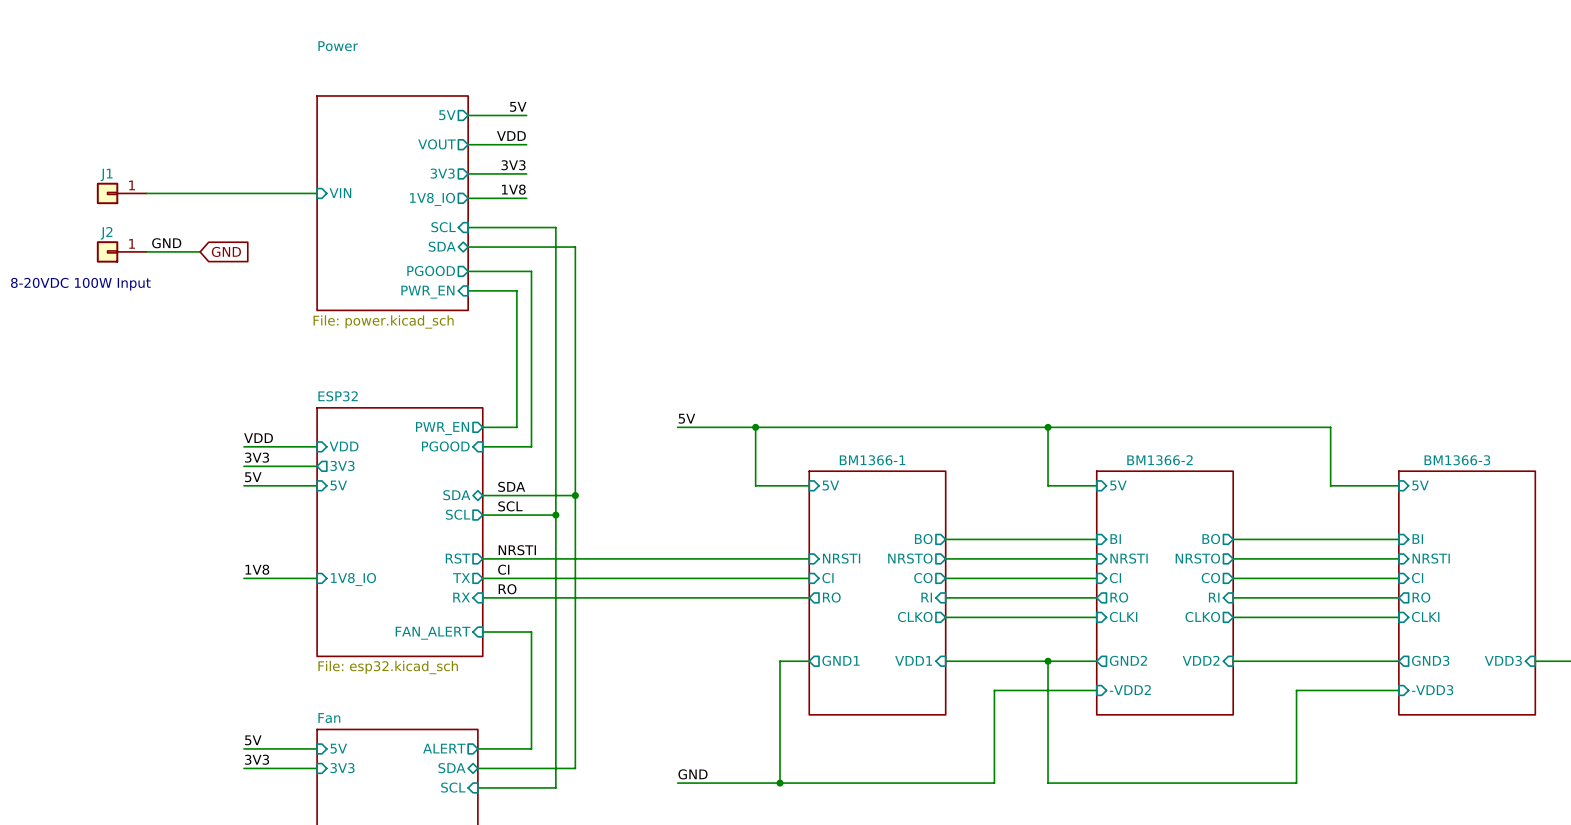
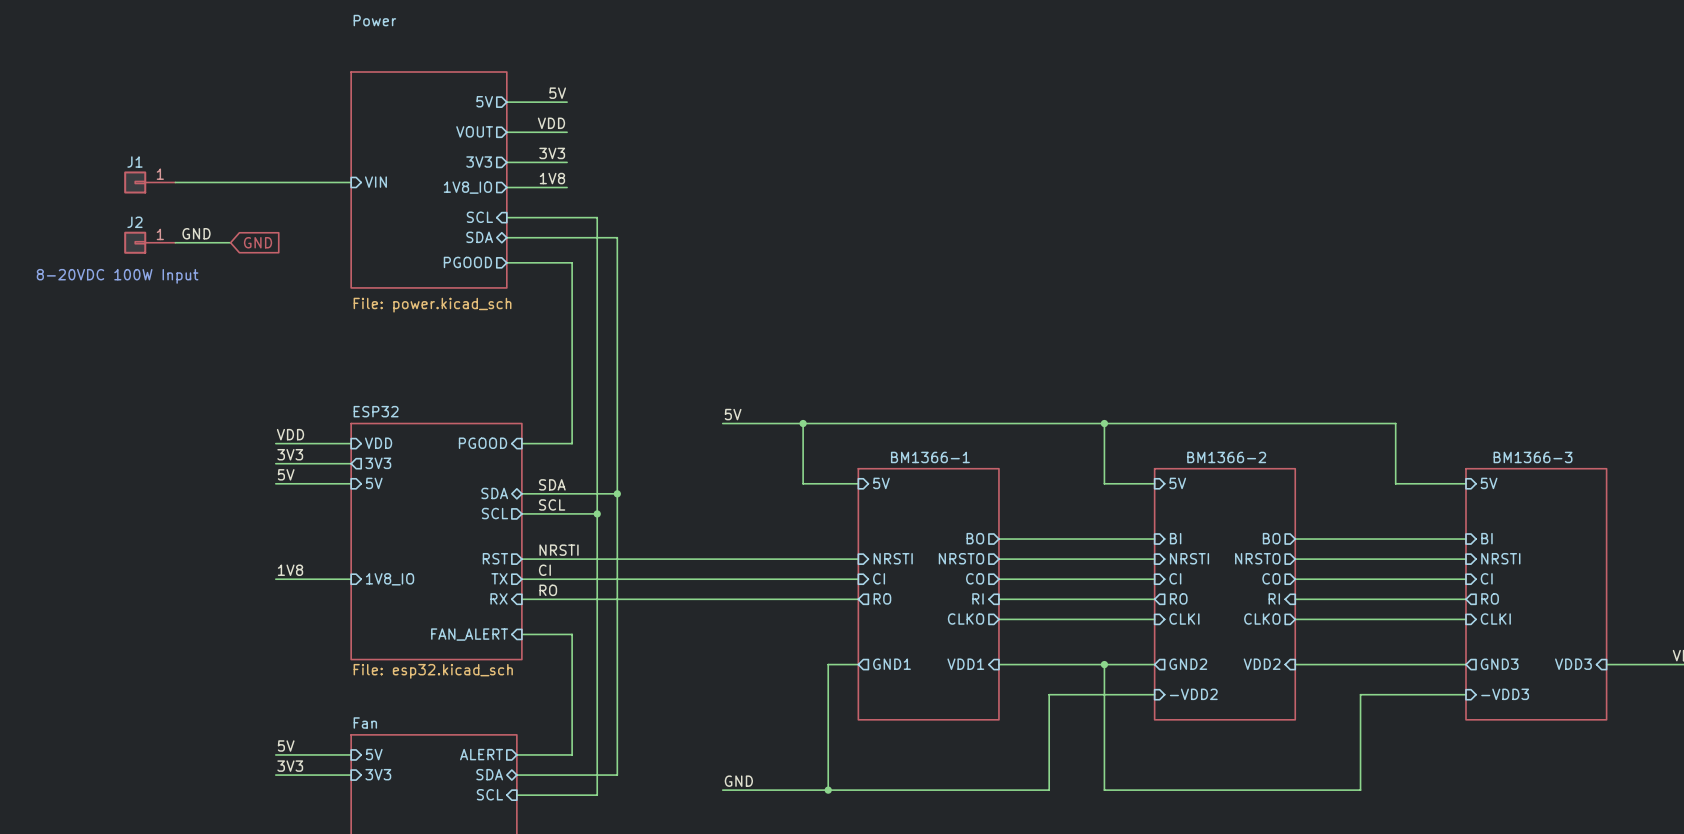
sheet Power: none -> File: power.kicad_sch (428, 179)
sheet Power: File: power.kicad_sch (392, 203) -> none
wire: (468, 290) (516, 290) (516, 427) (482, 427) -> none
sheet pin: PWR_EN (427, 292) -> none
sheet ESP32 shape: [316, 407, 484, 657] -> [350, 422, 523, 661]
sheet pin: PWR_EN (442, 428) -> none

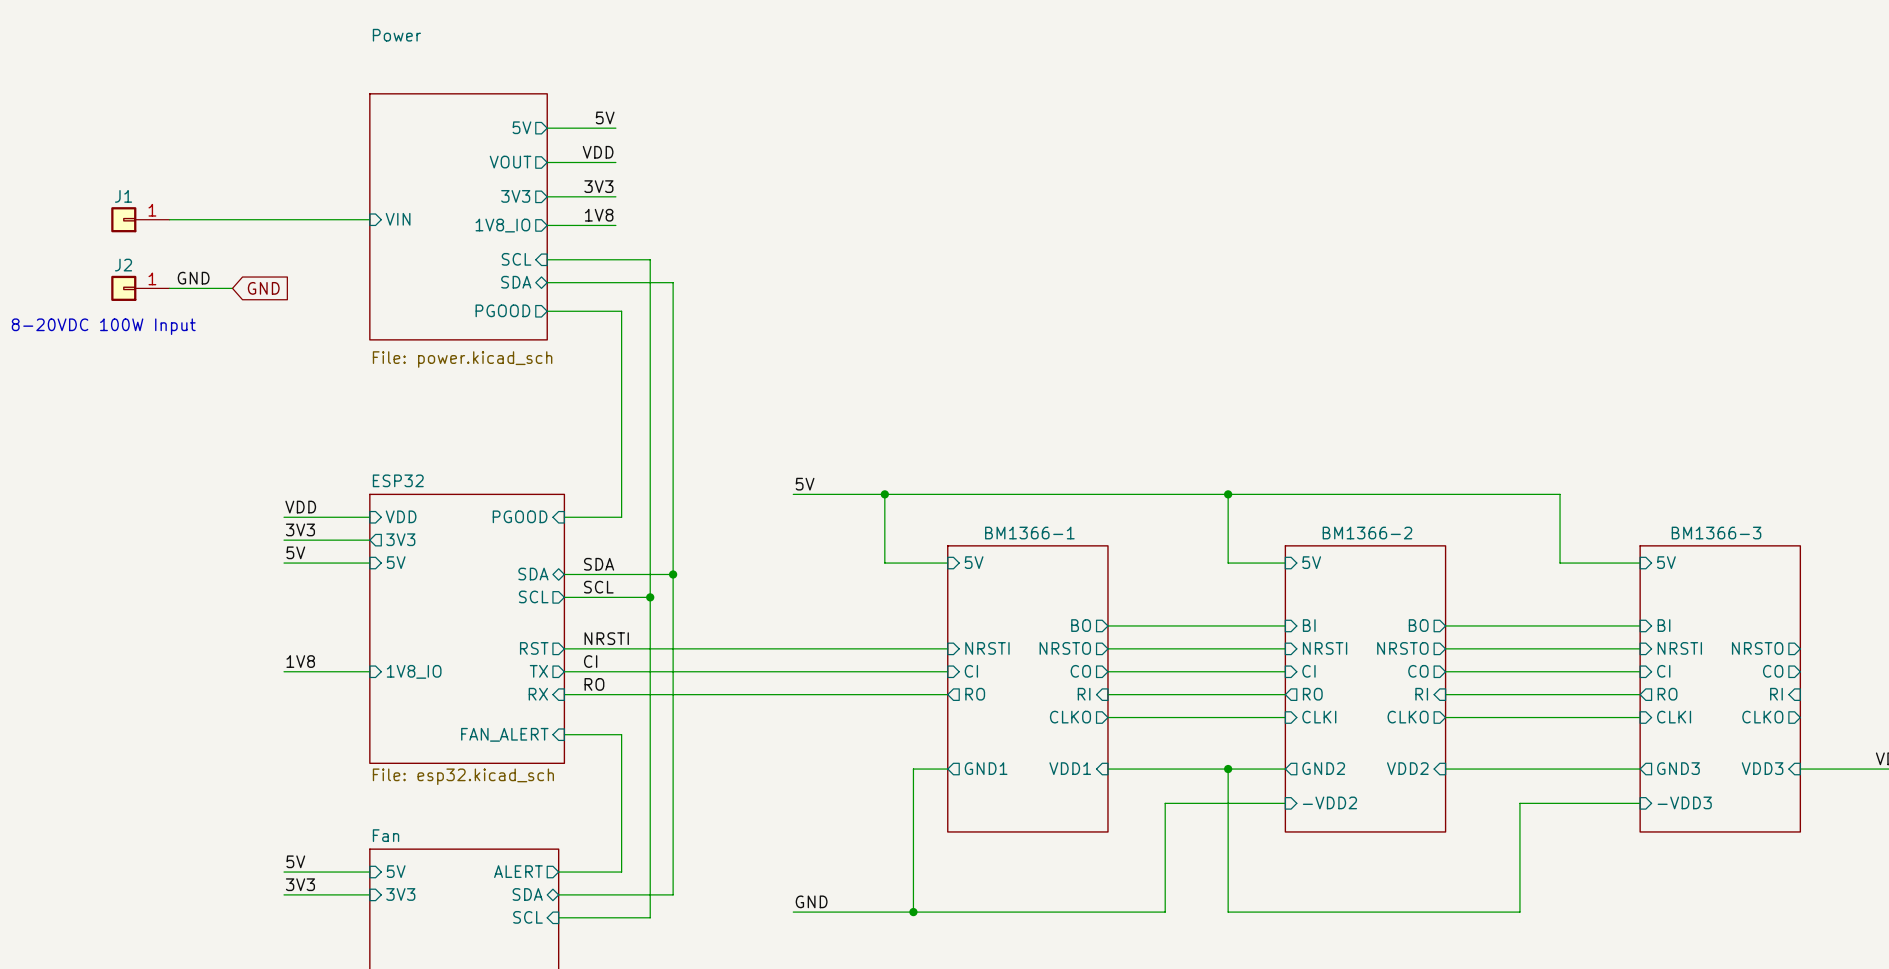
sheet pin: none -> NRSTO (1757, 648)
sheet pin: none -> CO (1773, 671)
sheet pin: none -> RI (1776, 694)
sheet pin: none -> CLKO (1762, 717)

